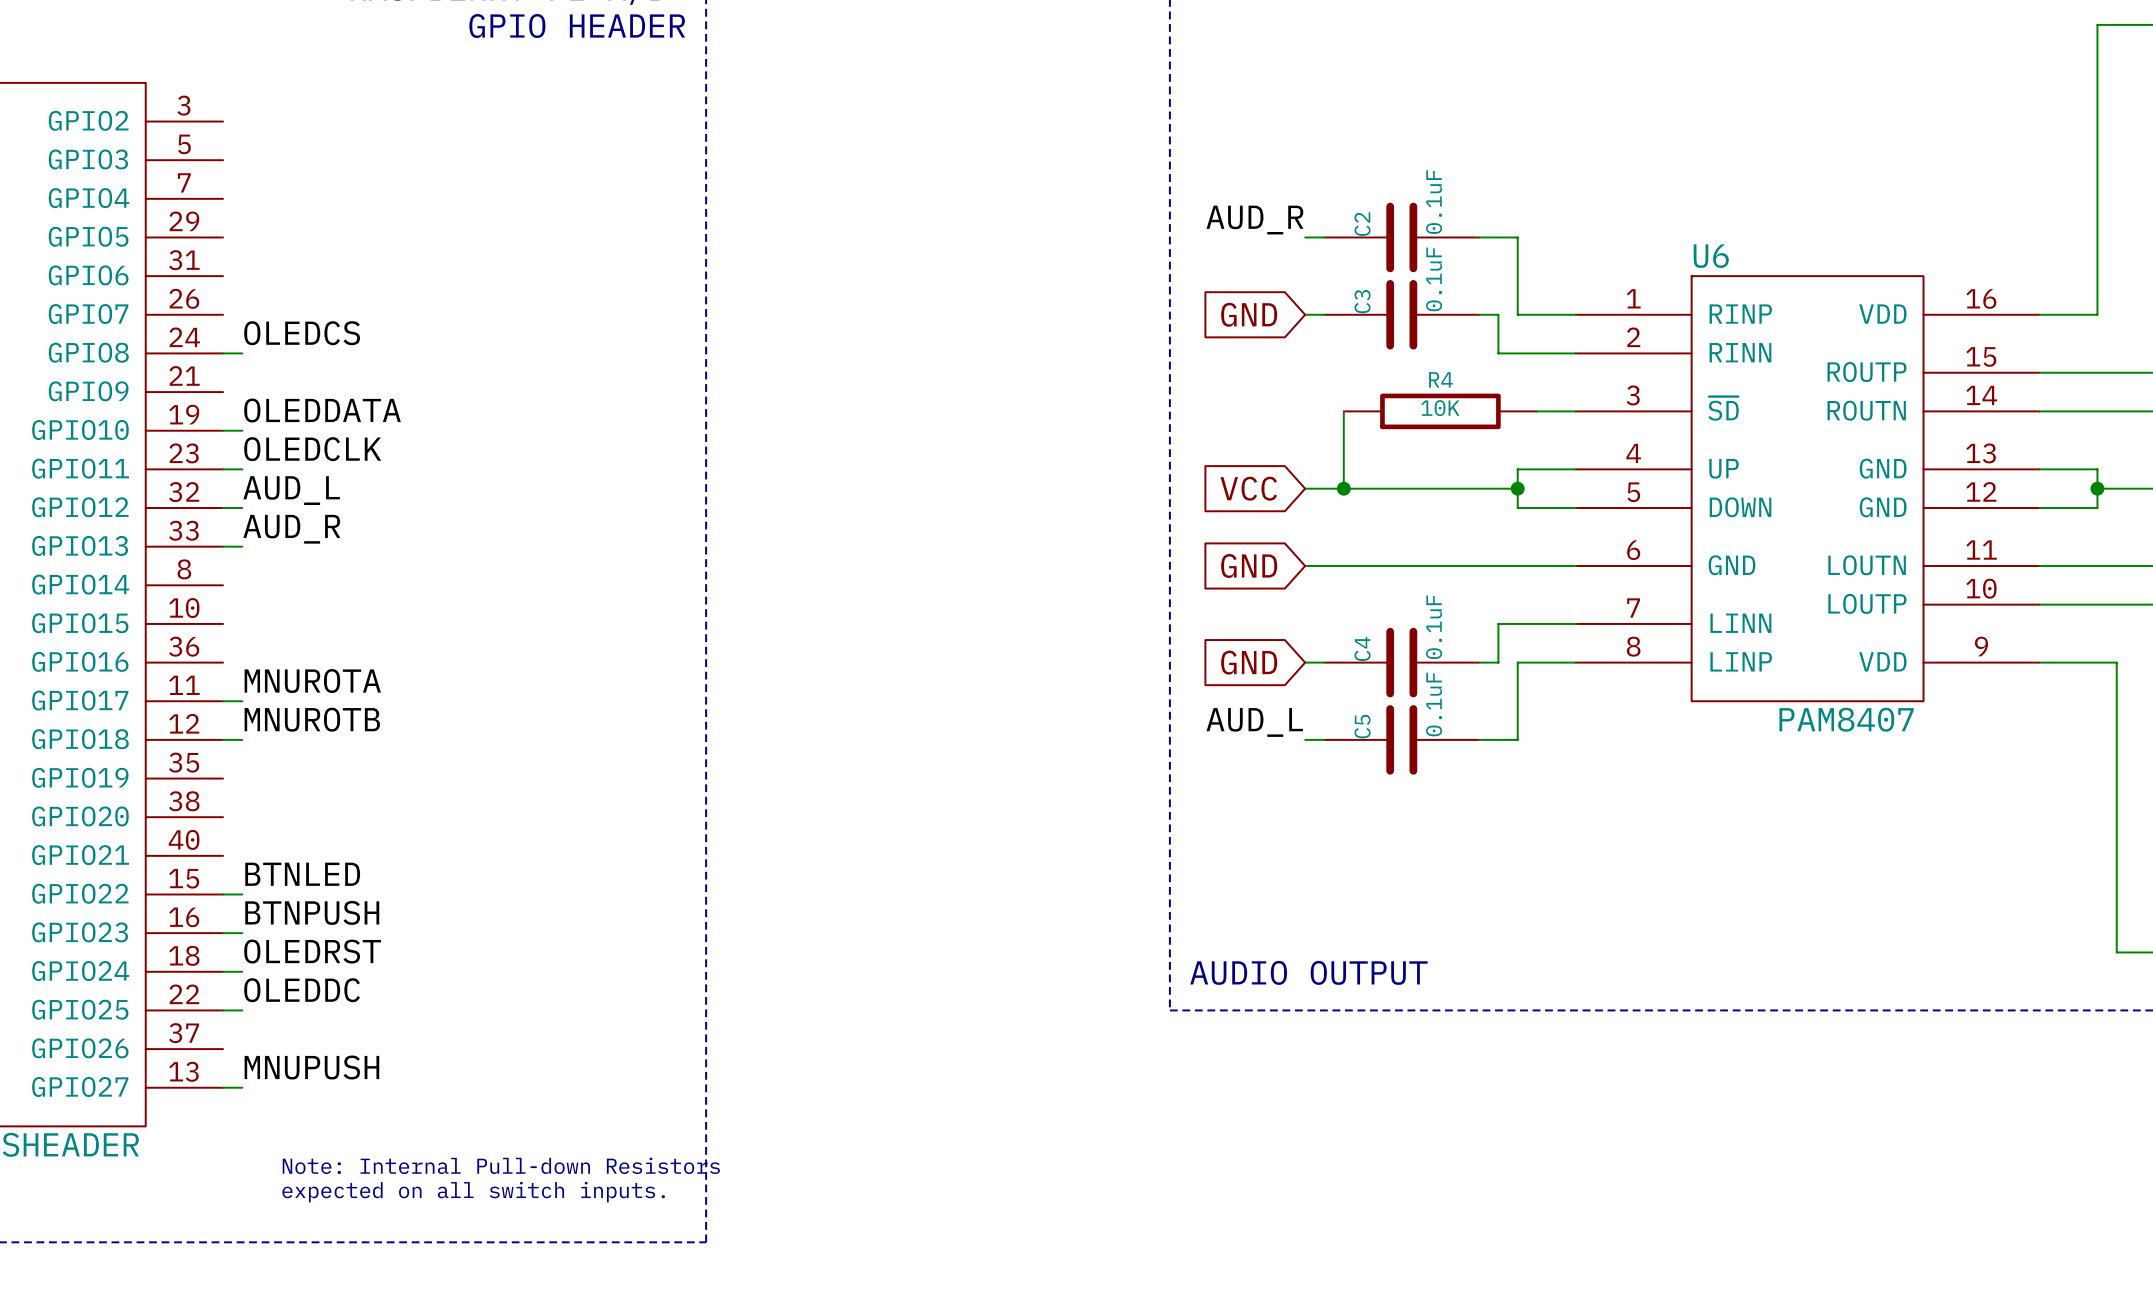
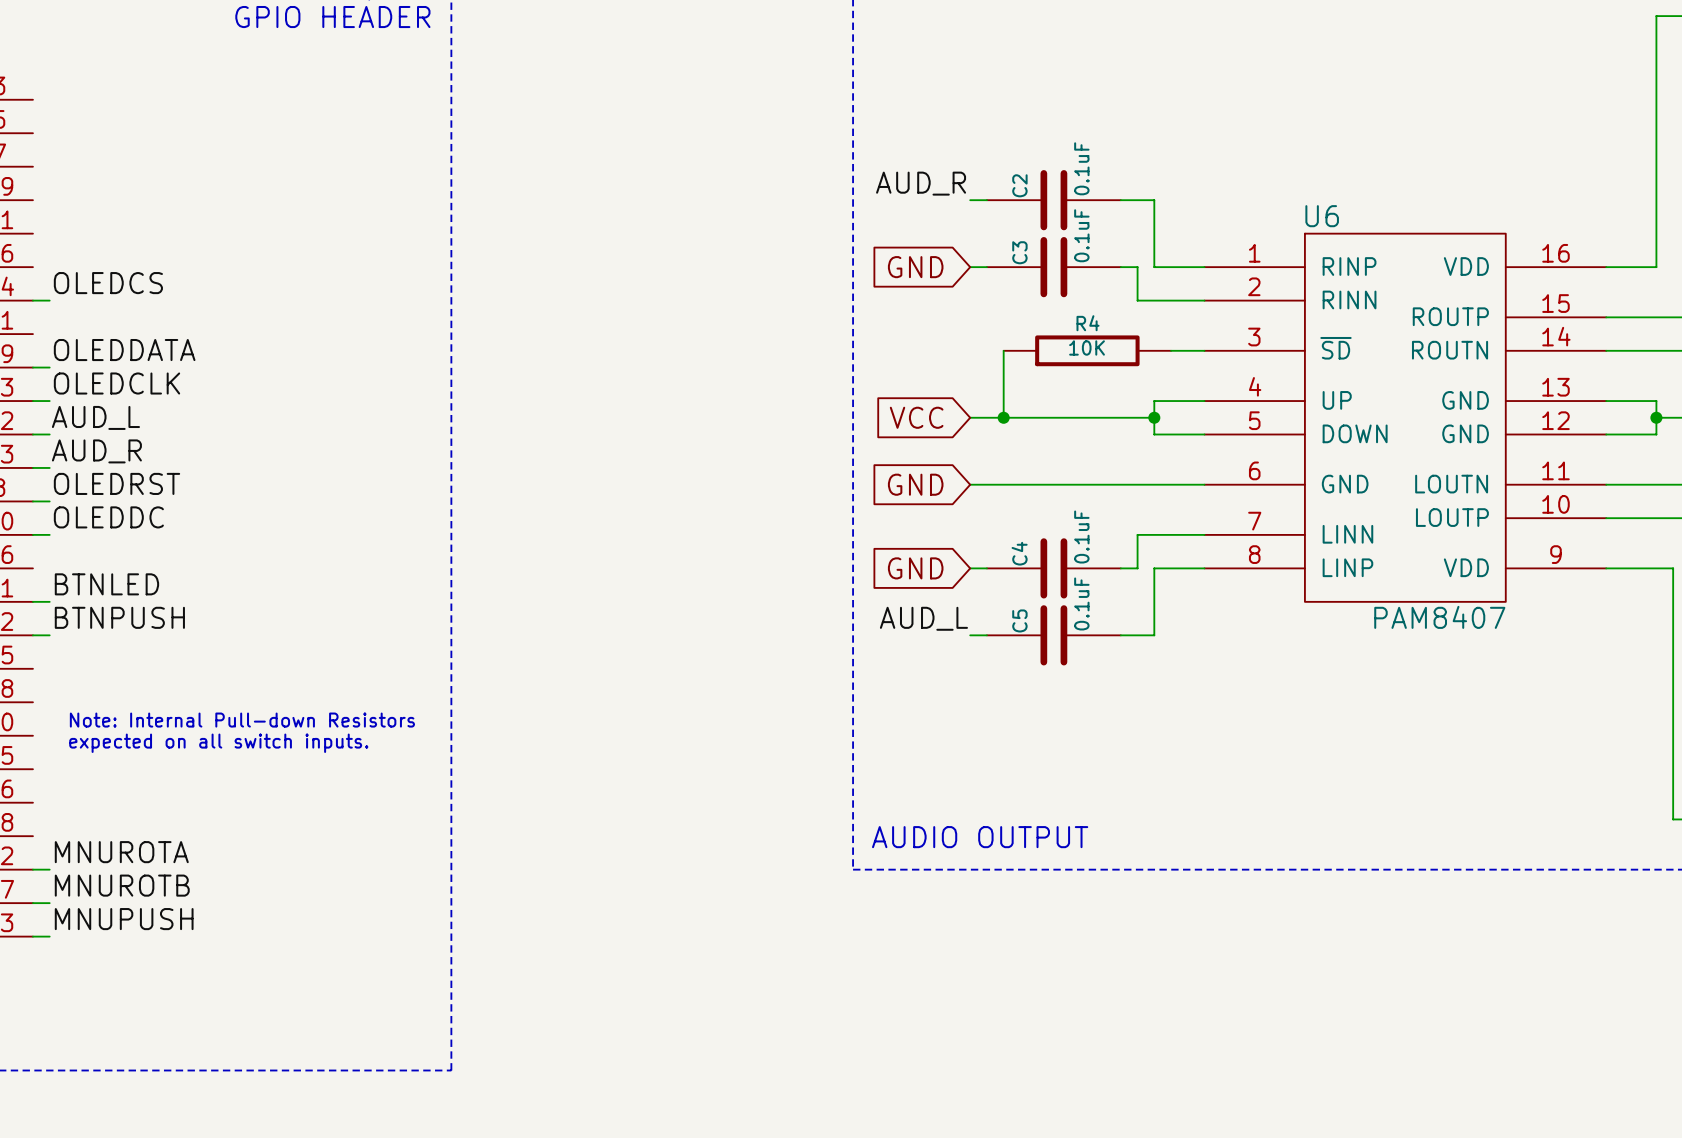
label: none -> OLEDRST (116, 483)
label: none -> OLEDDC (108, 517)
label: MNUROTA (312, 681) -> BTNLED (106, 584)
label: MNUROTB (312, 719) -> BTNPUSH (119, 617)
label: BTNLED (302, 874) -> none
wire: (223, 894) (242, 894) -> (32, 501) (49, 501)
label: BTNPUSH (312, 912) -> none
wire: (223, 933) (242, 933) -> (32, 534) (49, 534)
label: OLEDRST (312, 951) -> none
wire: (223, 971) (242, 971) -> (32, 903) (49, 903)
label: OLEDDC (302, 990) -> MNUROTA (121, 852)
label: none -> MNUROTB (122, 885)
text position: Note: Internal Pull-down Resistors (501, 1165) -> Note: Internal Pull-down Resistors (242, 720)
text position: expected on all switch inputs. (473, 1192) -> expected on all switch inputs. (218, 743)

